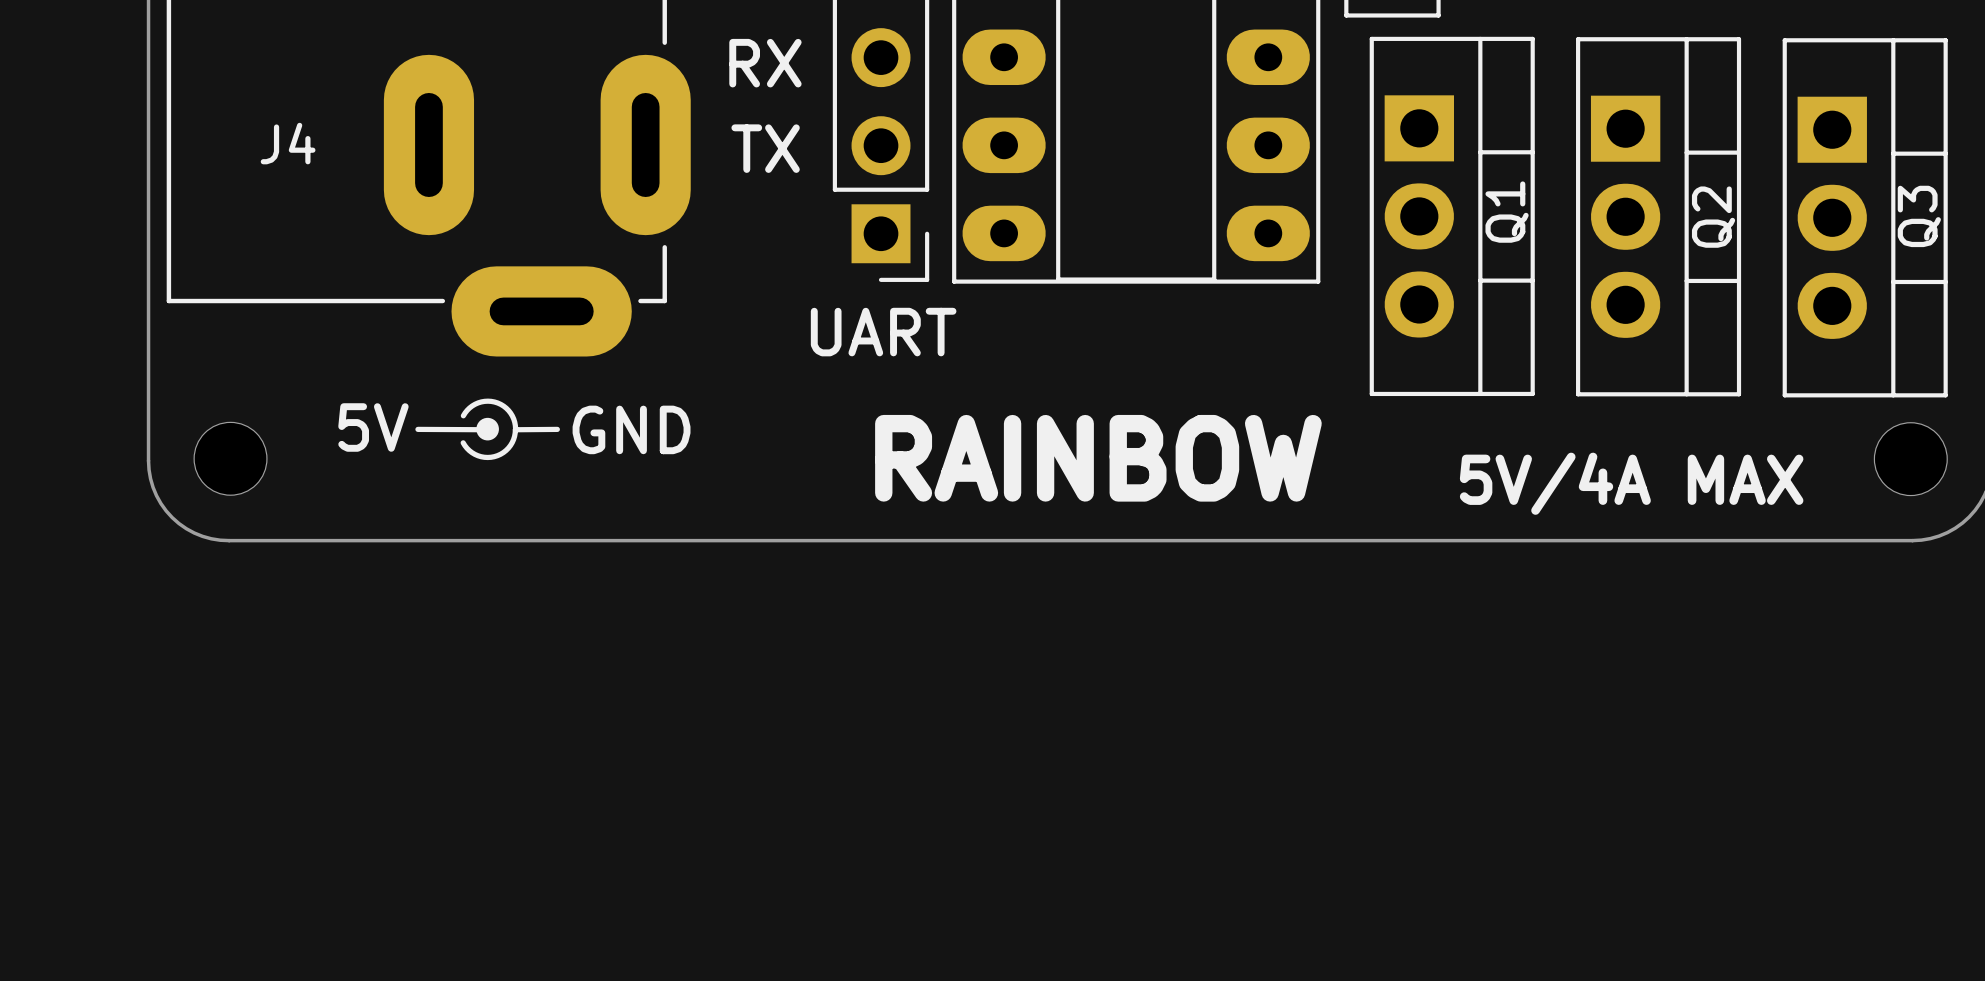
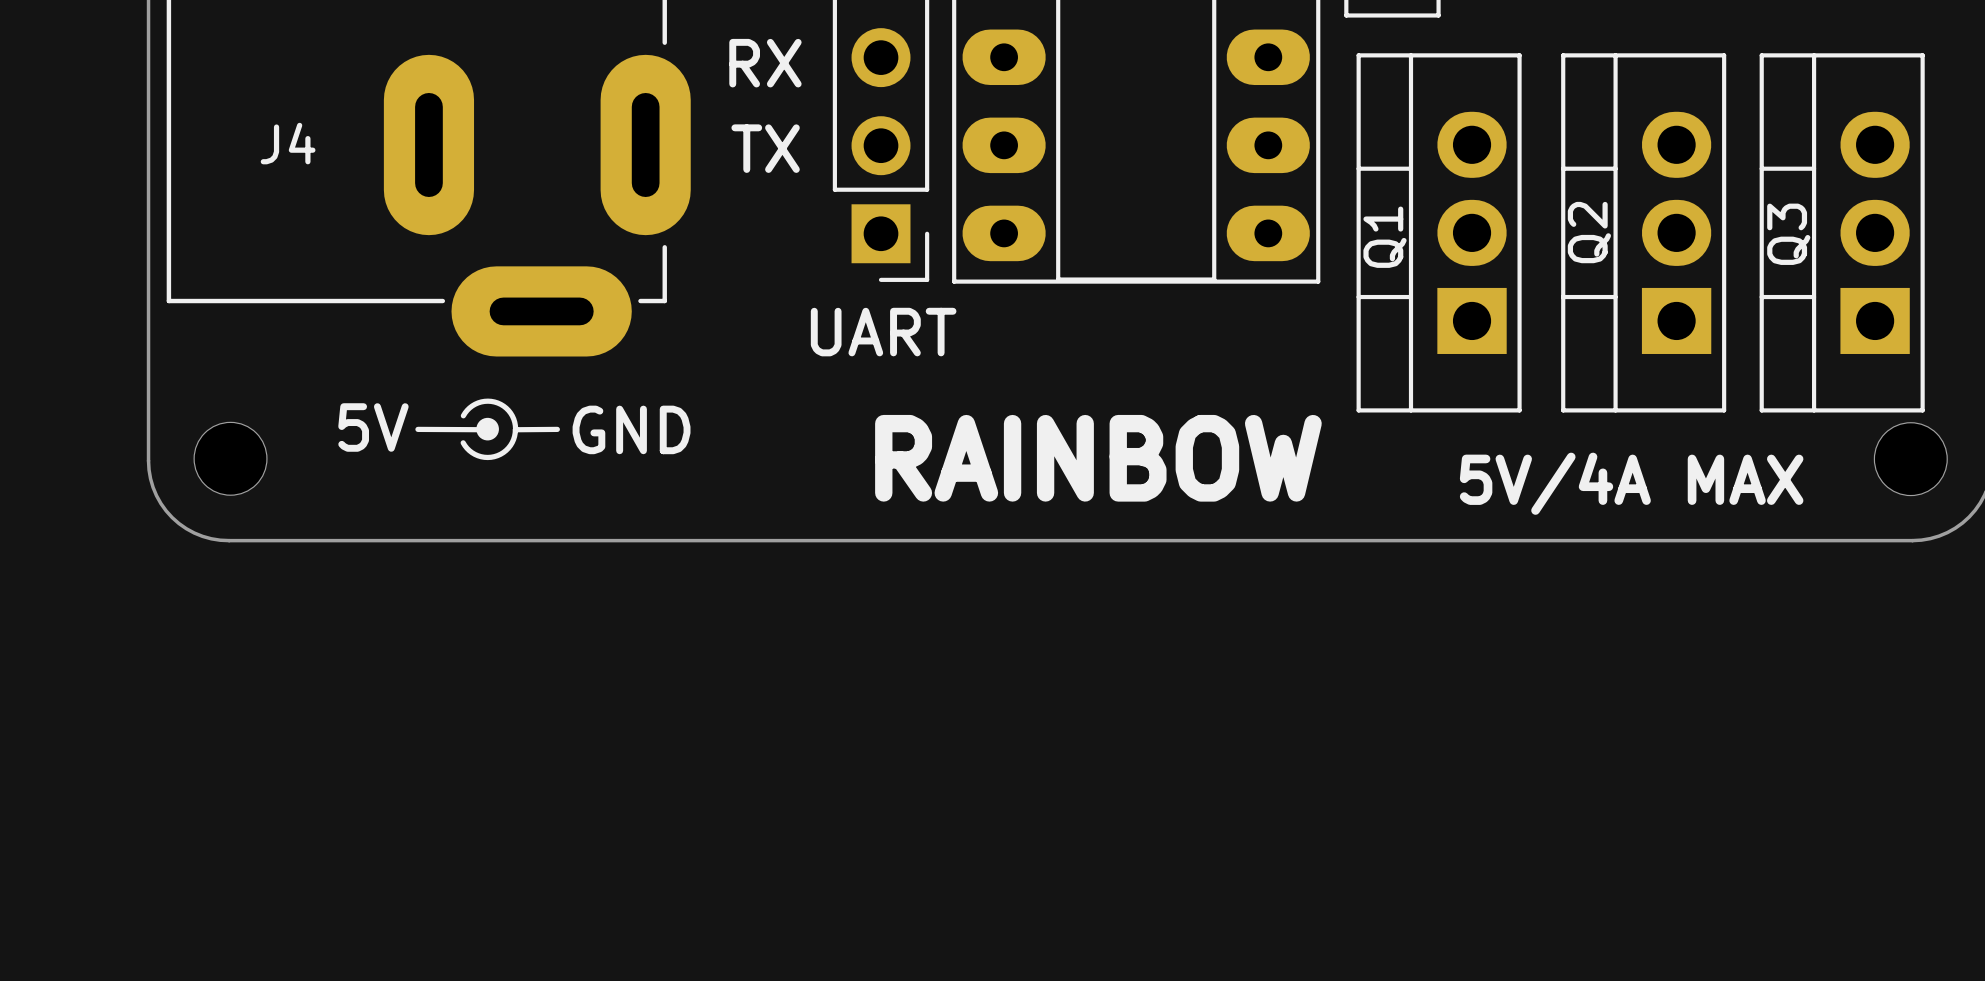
Q1 rotation: 0° (1452, 216) -> 180° (1439, 232)
Q2 rotation: 0° (1658, 216) -> 180° (1643, 232)
Q3 rotation: 0° (1865, 217) -> 180° (1842, 232)

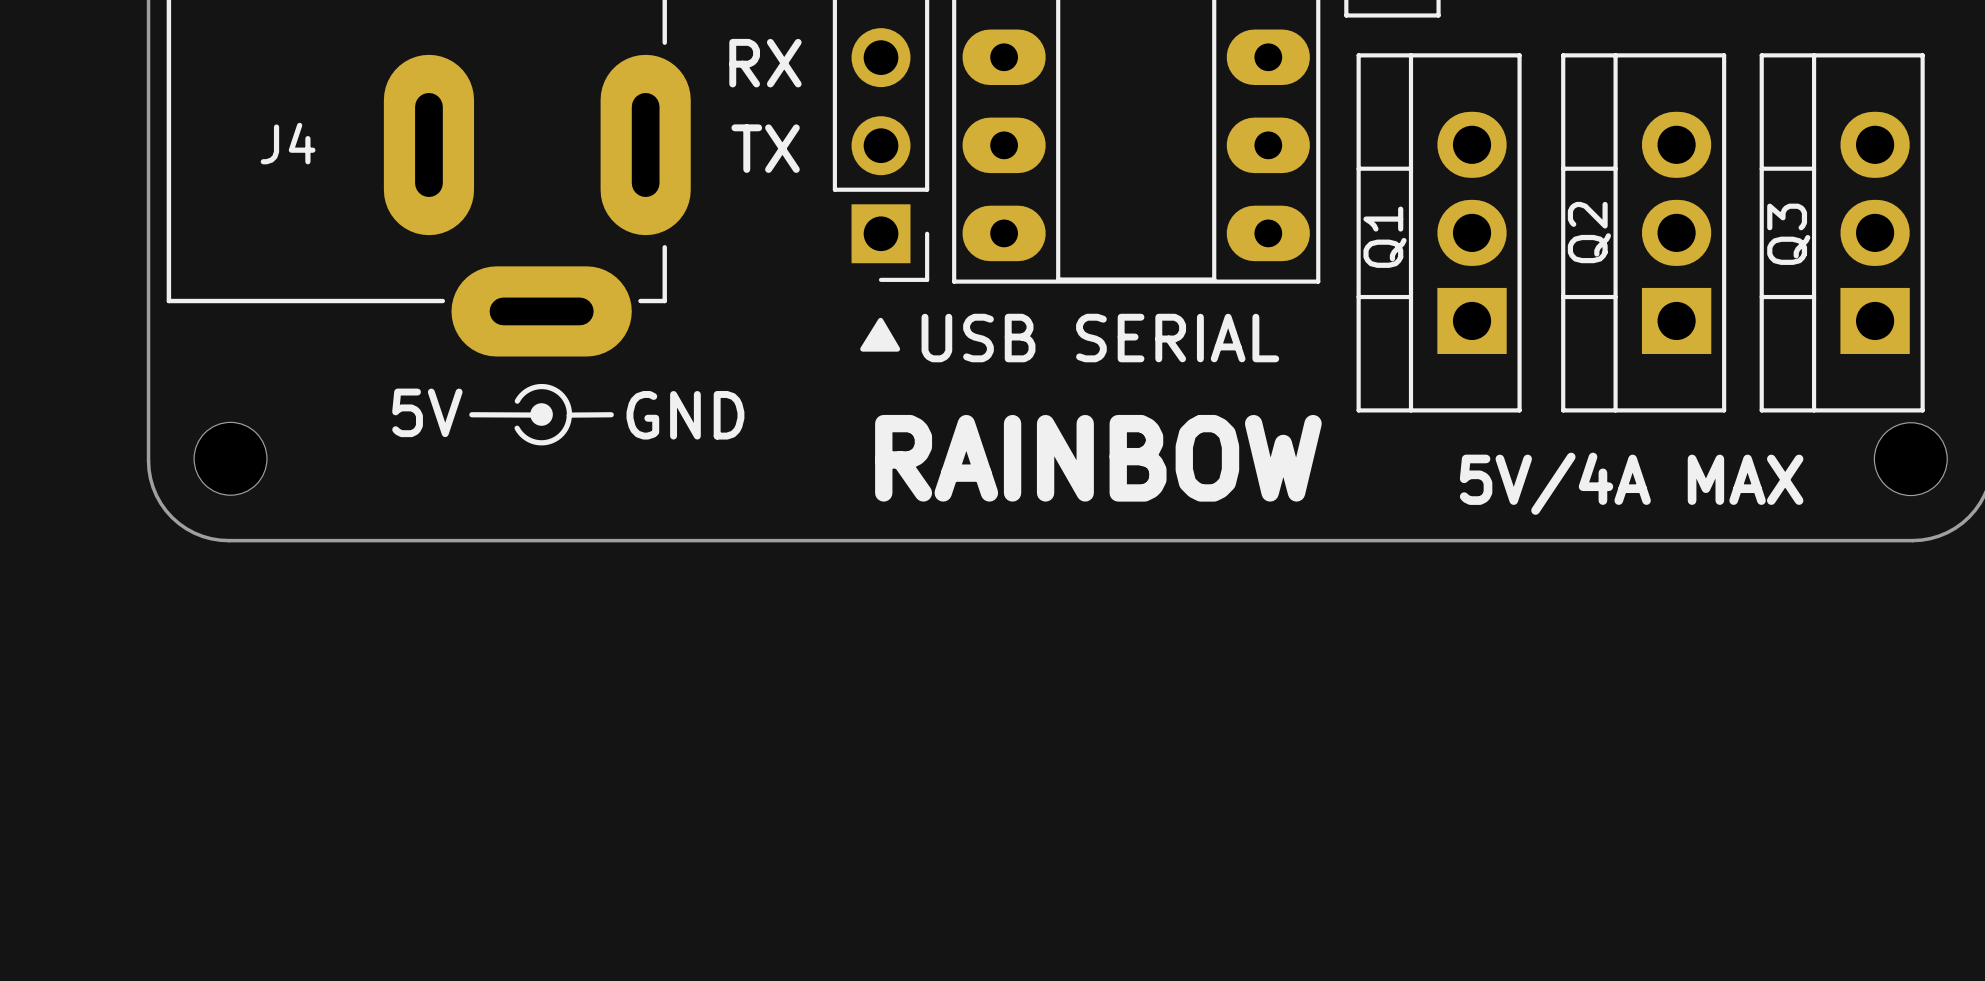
drawing: none -> [860, 317, 901, 352]
text: UART (883, 332) -> none
text: none -> USB SERIAL (1100, 338)
line: (463, 415) (469, 408) (478, 402) (494, 402) (503, 406) (510, 413) (515, 428) -> (517, 401) (523, 393) (532, 388) (548, 387) (562, 395) (567, 404) (569, 414)
text position: 5V (373, 427) -> 5V (427, 412)
line: (417, 429) (487, 429) -> (471, 414) (541, 415)
drawing position: (487, 429) -> (541, 414)
line: (557, 429) (515, 429) (513, 439) (508, 448) (500, 454) (491, 457) (474, 454) (463, 442) -> (611, 414) (569, 415) (567, 424) (562, 433) (554, 439) (545, 442) (528, 439) (517, 428)
text position: GND (631, 429) -> GND (685, 415)

